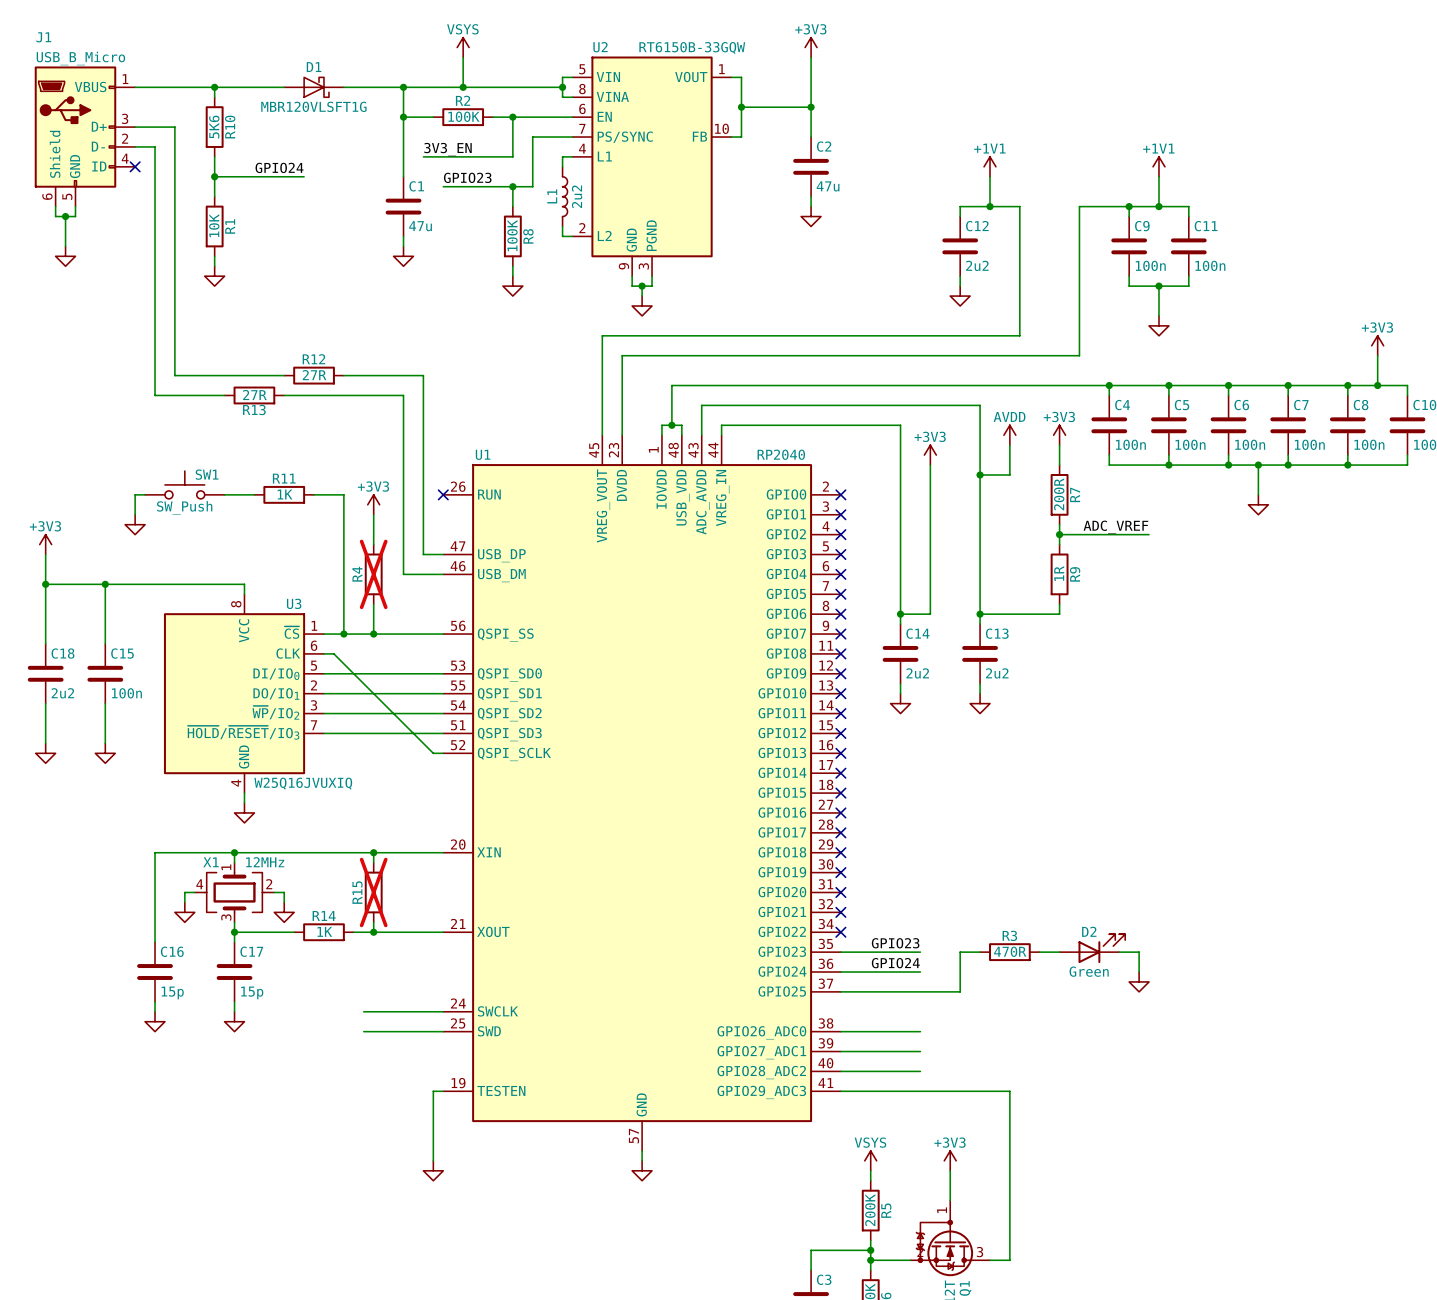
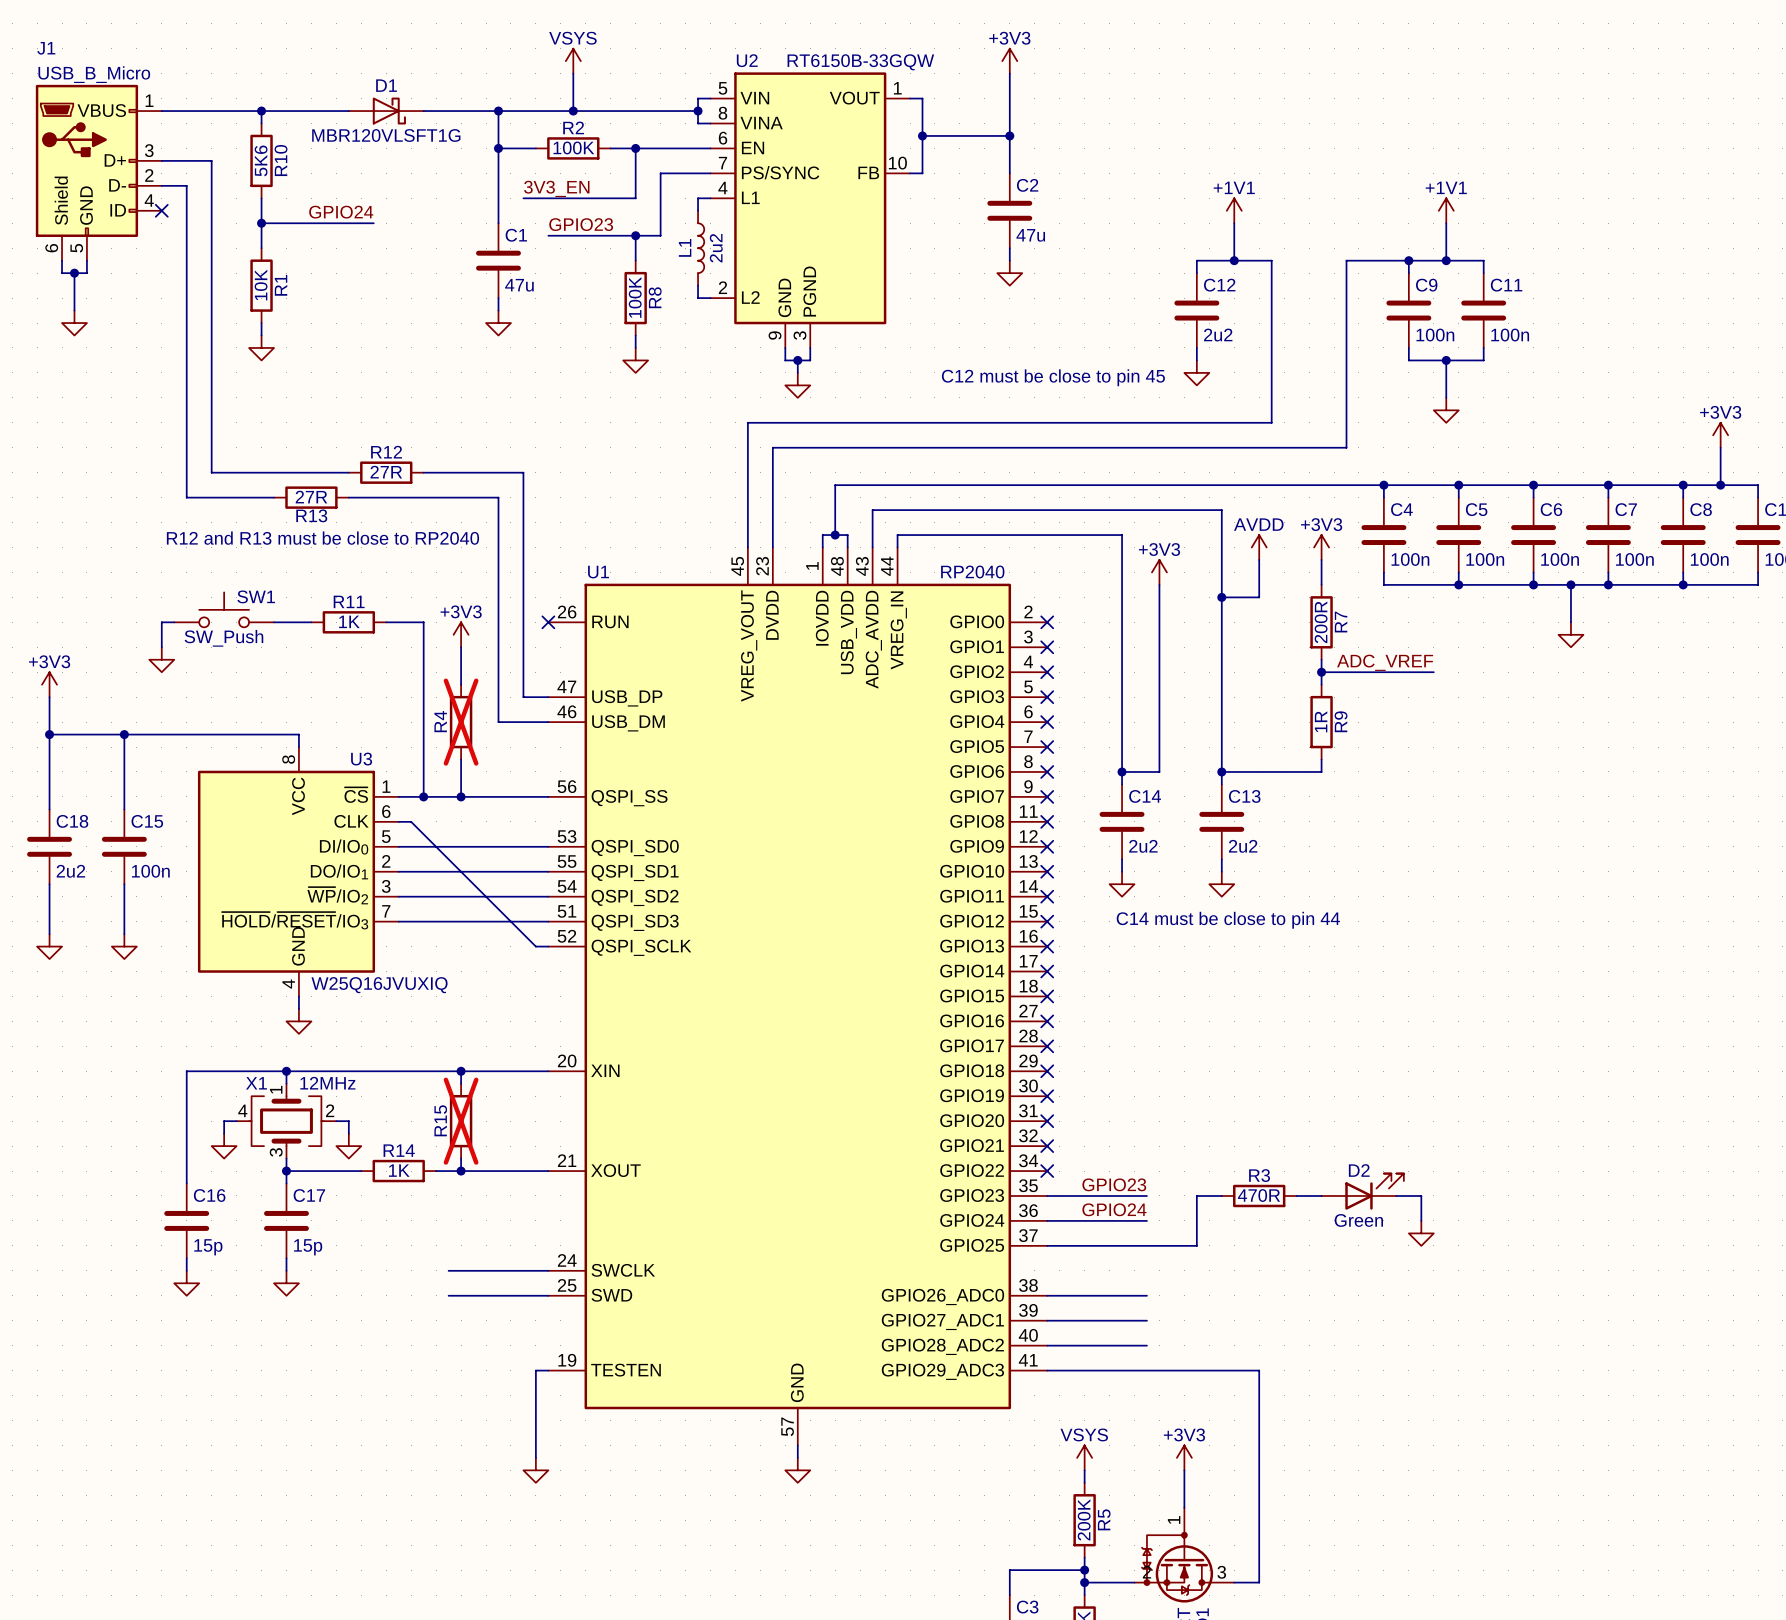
text: none -> C12 must be close to pin 45 (1053, 377)
text: none -> R12 and R13 must be close to RP2040 (322, 538)
text: none -> C14 must be close to pin 44 (1228, 920)

